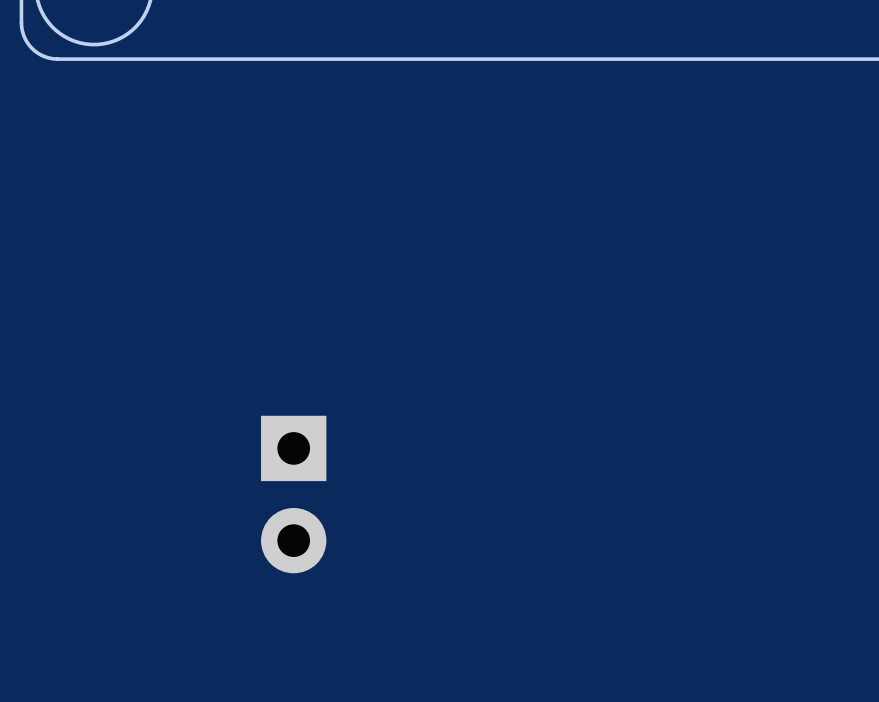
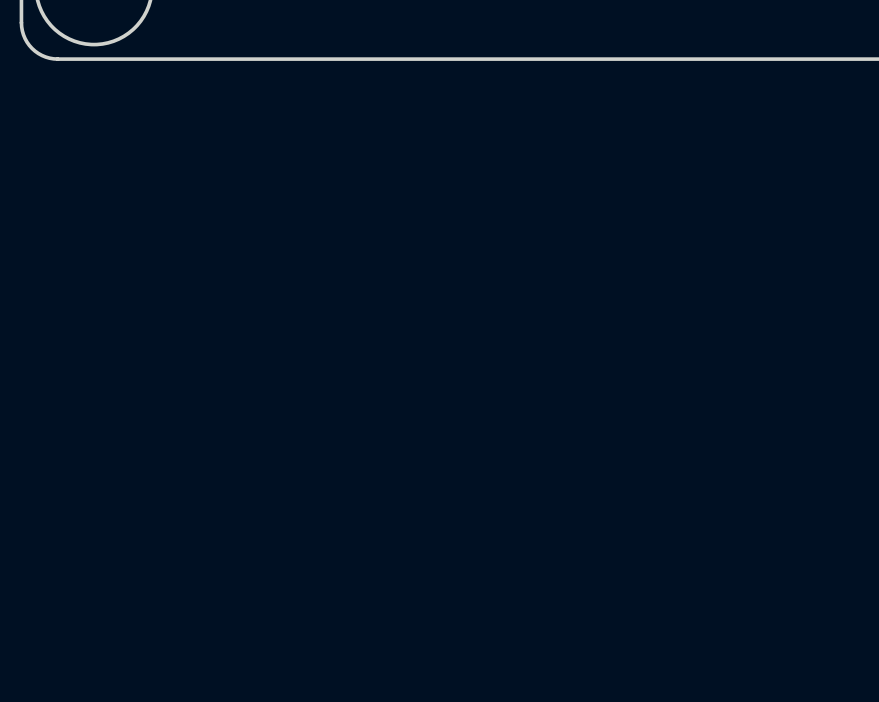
part: (293, 494) -> none

